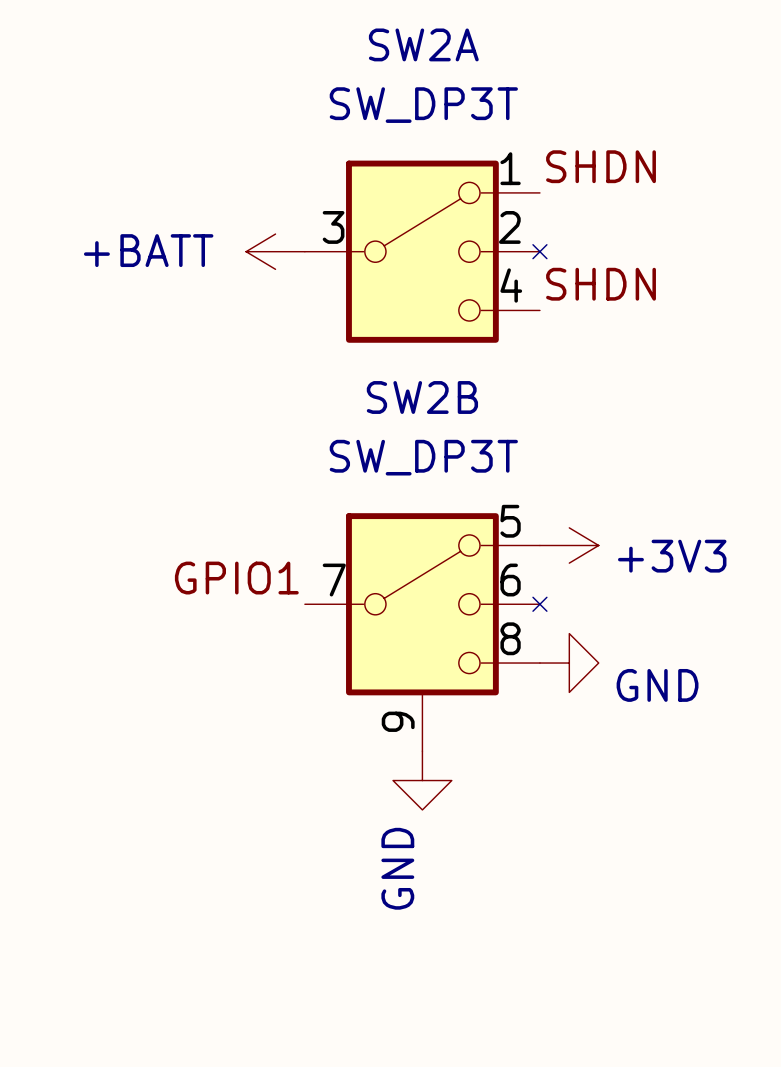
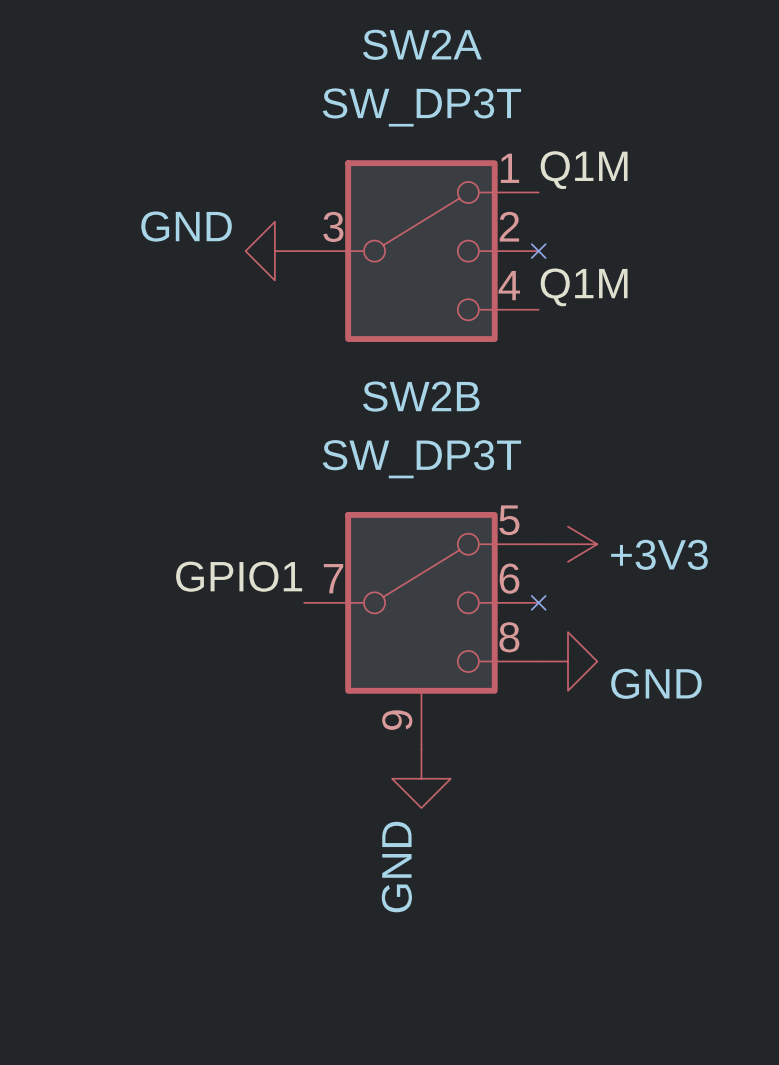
label: SHDN (601, 166) -> Q1M (584, 170)
power symbol: +BATT (275, 251) -> GND (274, 251)
label: SHDN (601, 284) -> Q1M (584, 287)

